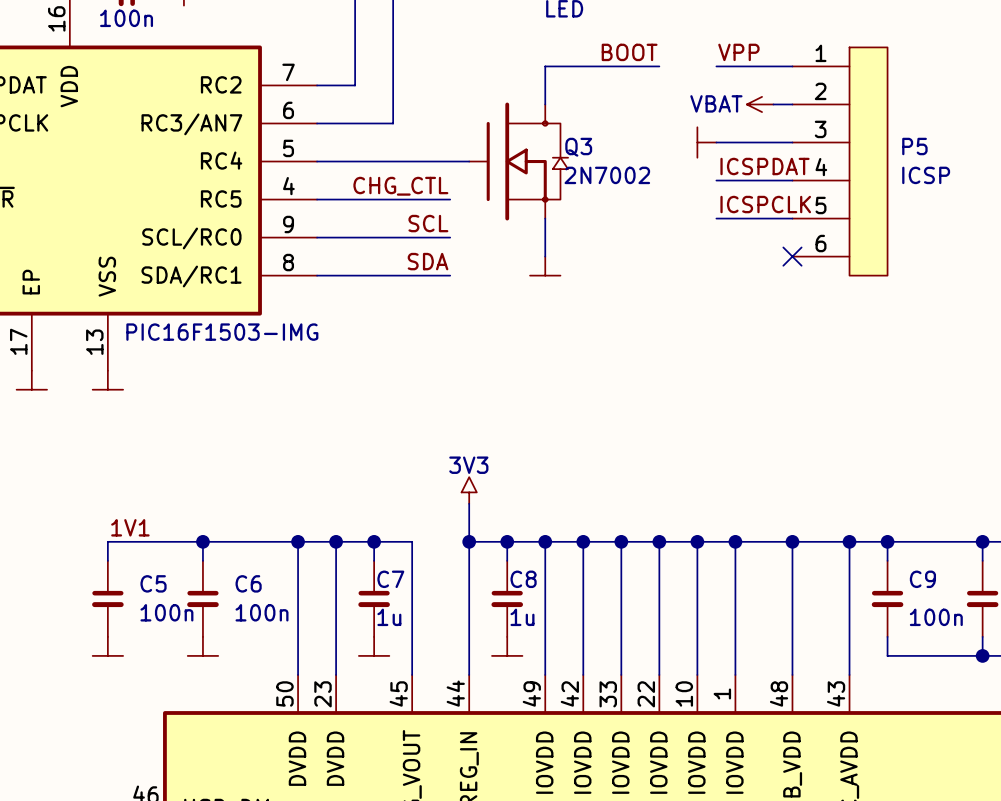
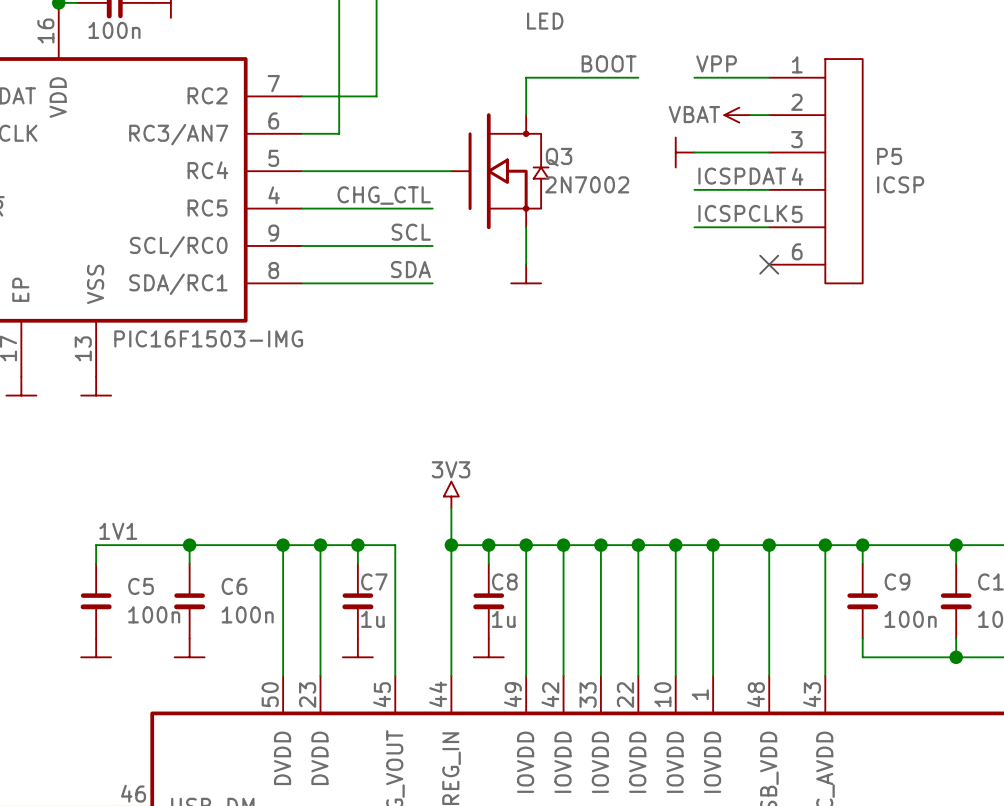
wire: (393, 85) (393, 123) (355, 123) -> (376, 96) (339, 96) (339, 133)

